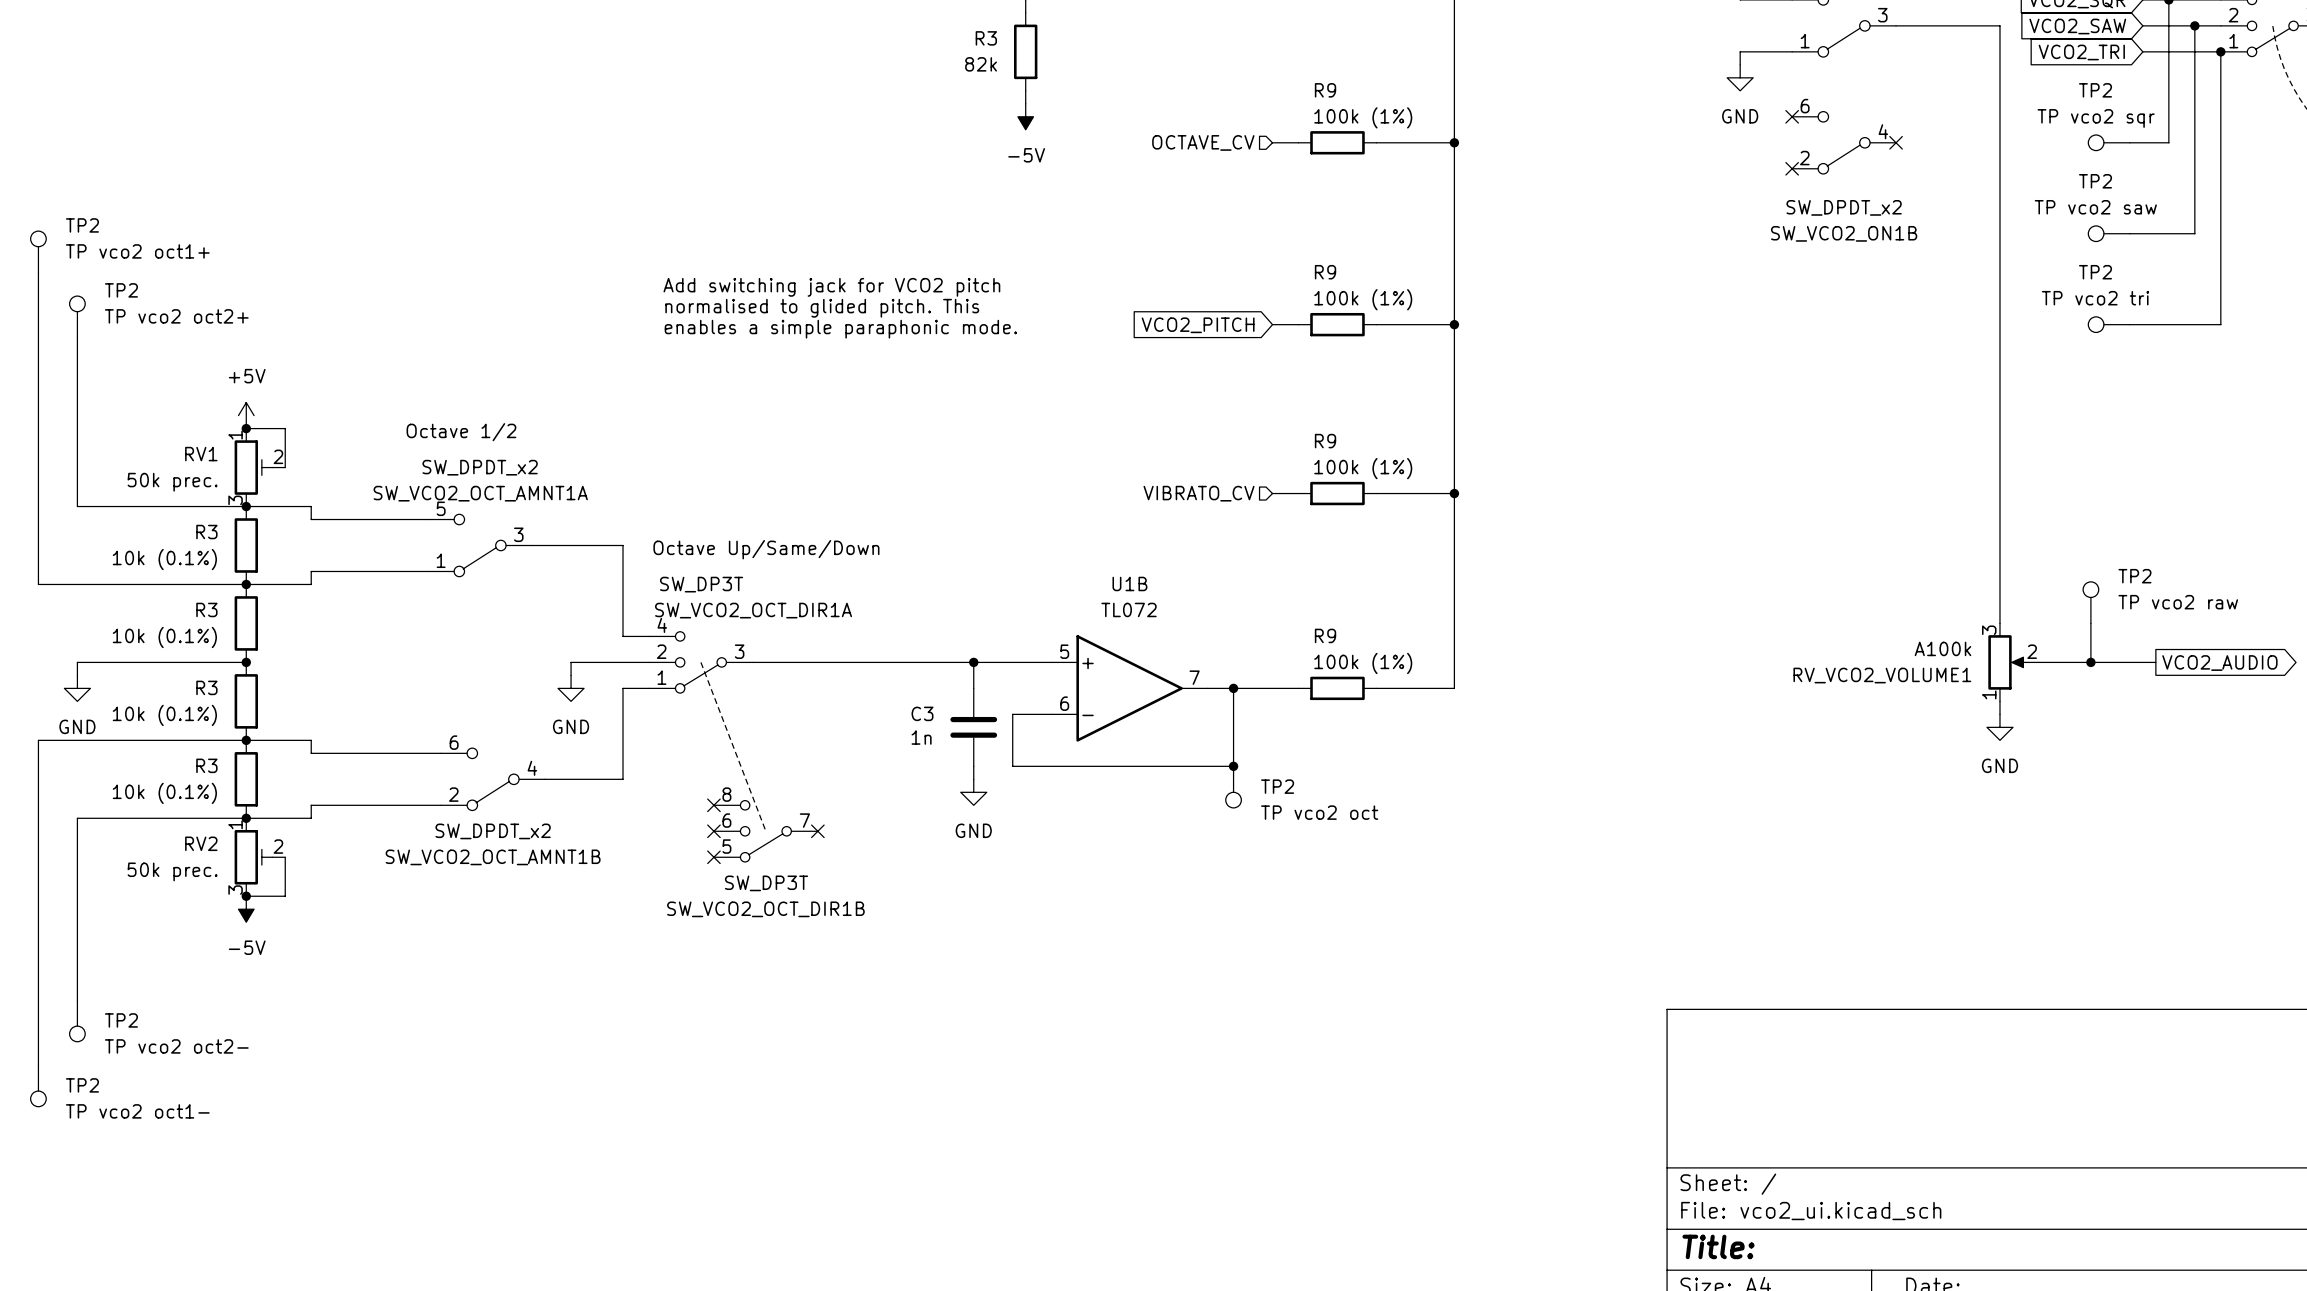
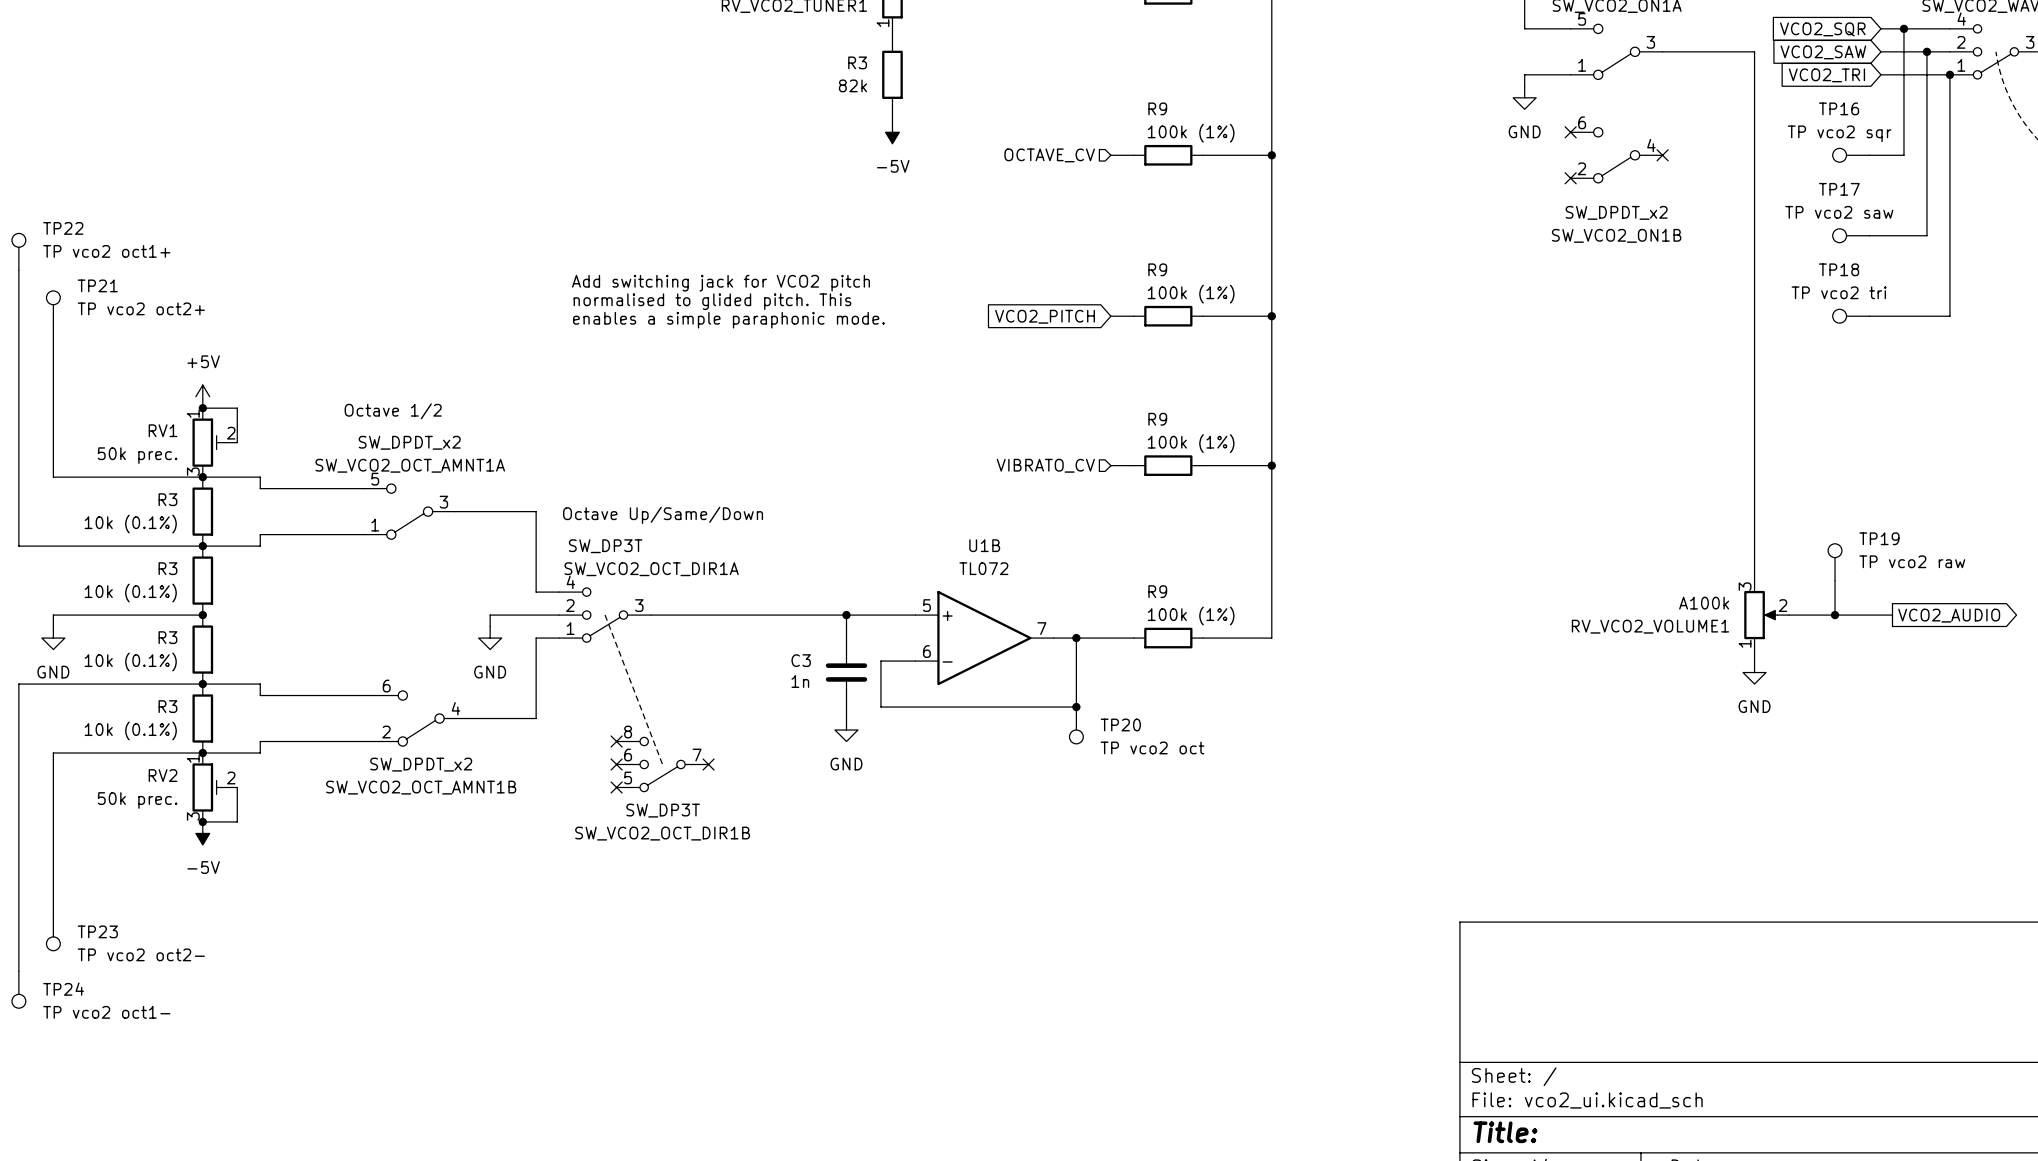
TP2 name: TP2 (2095, 90) -> TP16 (1839, 108)
TP2 name: TP2 (2095, 181) -> TP17 (1839, 189)
TP2 name: TP2 (82, 225) -> TP22 (63, 228)
TP2 name: TP2 (2095, 272) -> TP18 (1839, 269)
TP2 name: TP2 (121, 290) -> TP21 (97, 285)
TP2 name: TP2 (2134, 576) -> TP19 (1879, 538)
TP2 name: TP2 (1277, 786) -> TP20 (1120, 724)
TP2 name: TP2 (121, 1020) -> TP23 (97, 931)
TP2 name: TP2 (82, 1085) -> TP24 (63, 989)

